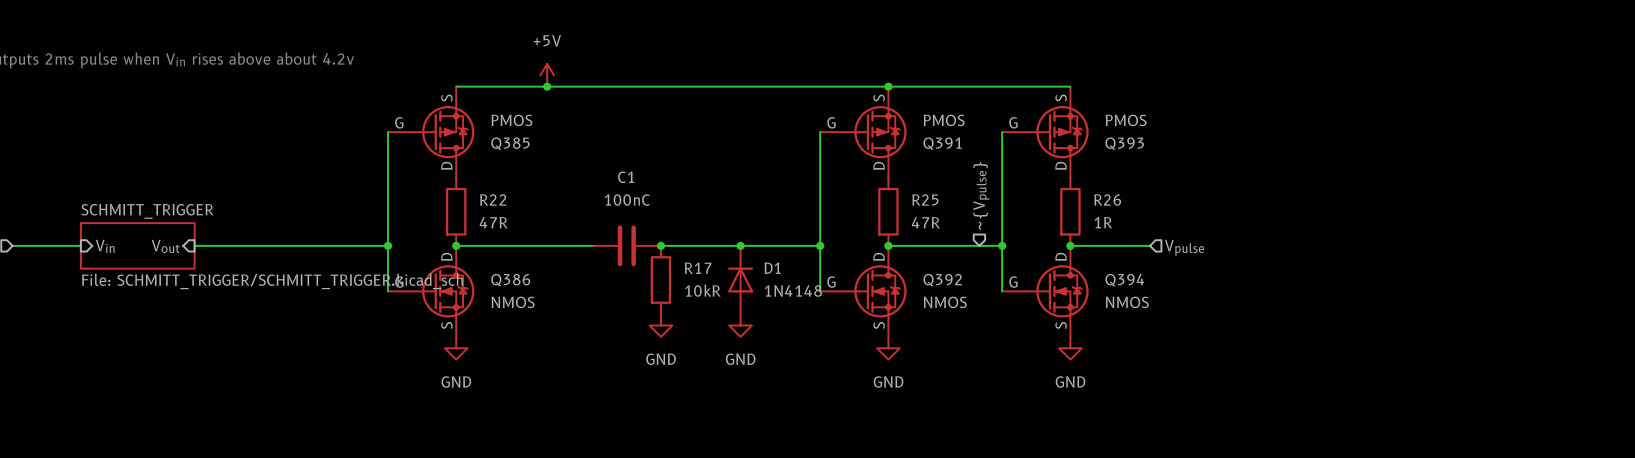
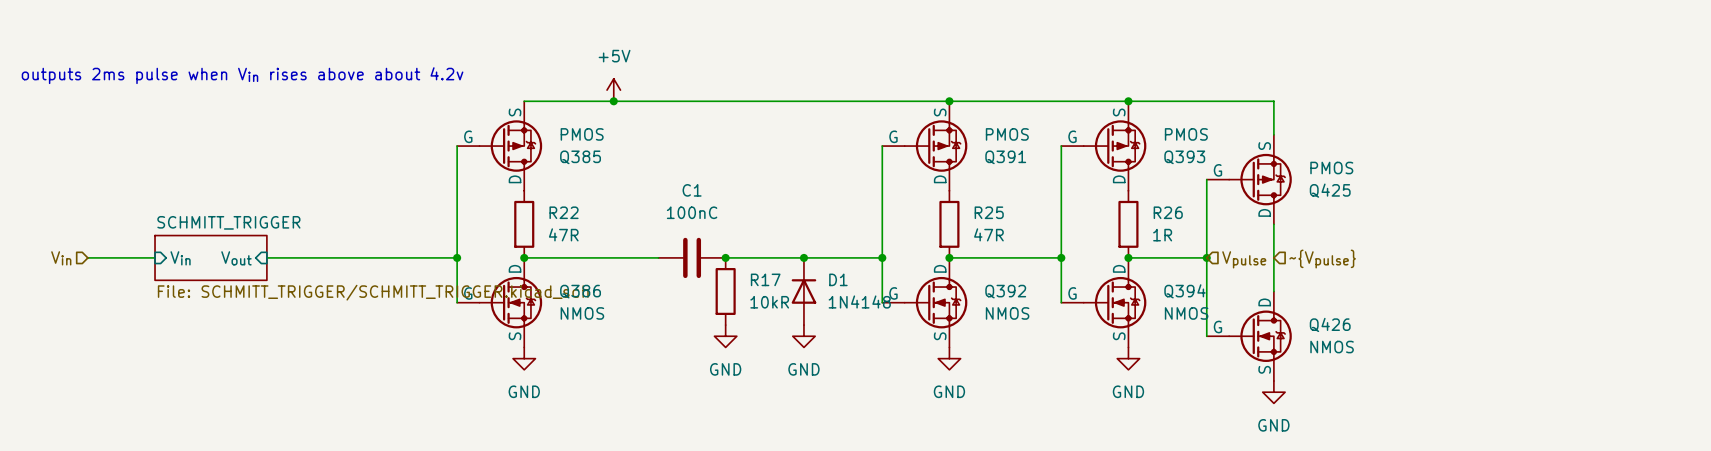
wire: none -> (1128, 101) (1273, 101) (1273, 134)
junction: none -> (1128, 101)
wire: none -> (1206, 179) (1206, 336)
Q425: none -> PMOS (1249, 179)
hierarchical label: ~{Vpulse} (981, 196) -> none
wire: none -> (1273, 224) (1273, 291)
junction: none -> (1206, 257)
hierarchical label: none -> ~{Vpulse} (1322, 259)
Q426: none -> NMOS (1249, 336)
power symbol: none -> GND (1273, 392)

